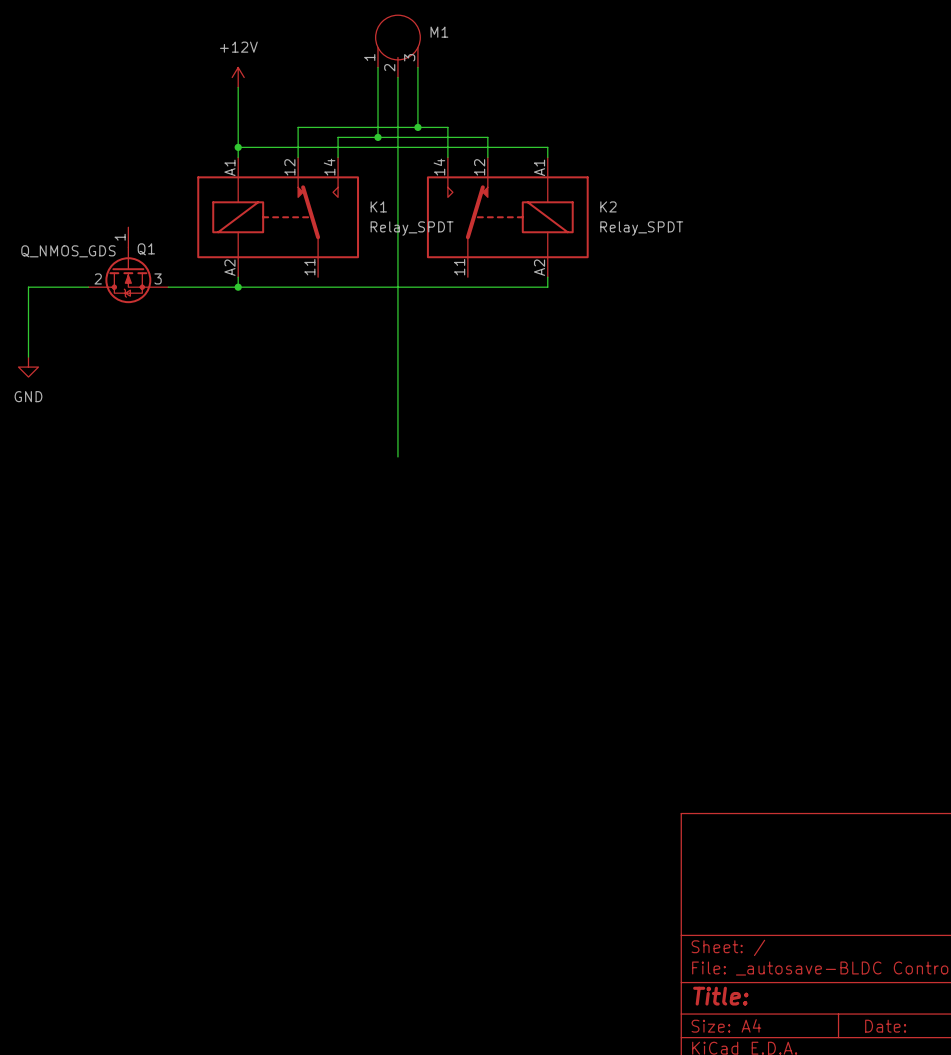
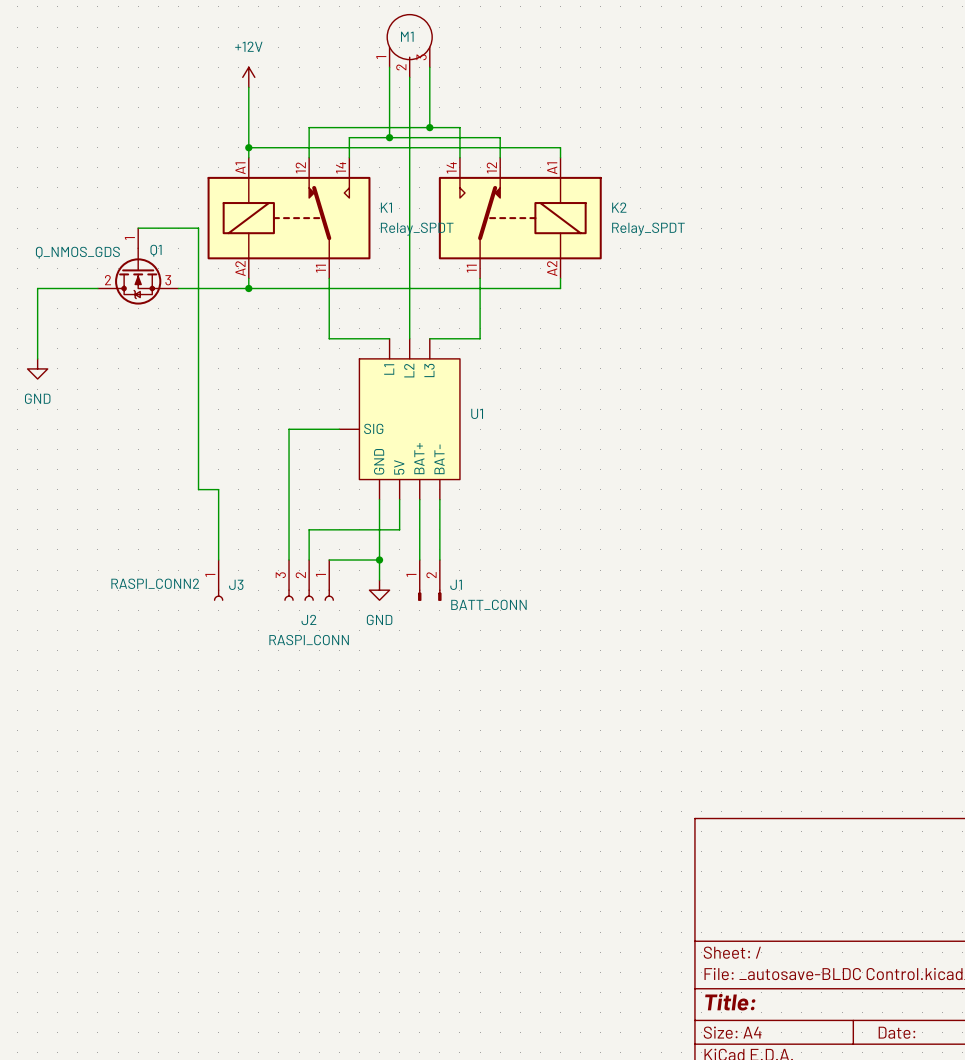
M1 name position: M1 (439, 32) -> M1 (407, 36)
wire: none -> (138, 228) (198, 228) (198, 489) (218, 489) (218, 560)
wire: none -> (329, 278) (329, 338) (389, 338)
wire: none -> (480, 278) (480, 338) (429, 338)
U1: none -> (399, 419)
wire: none -> (339, 429) (289, 429) (289, 560)
wire: none -> (379, 499) (379, 580)
wire: none -> (399, 499) (399, 529) (309, 529) (309, 560)
wire: none -> (419, 499) (419, 560)
wire: none -> (439, 499) (439, 560)
wire: none -> (329, 560) (379, 560)
junction: none -> (379, 560)
J3: none -> RASPI_CONN2 (218, 580)
J2: none -> RASPI_CONN (309, 580)
J1: none -> BATT_CONN (429, 580)
power symbol: none -> GND (379, 590)

